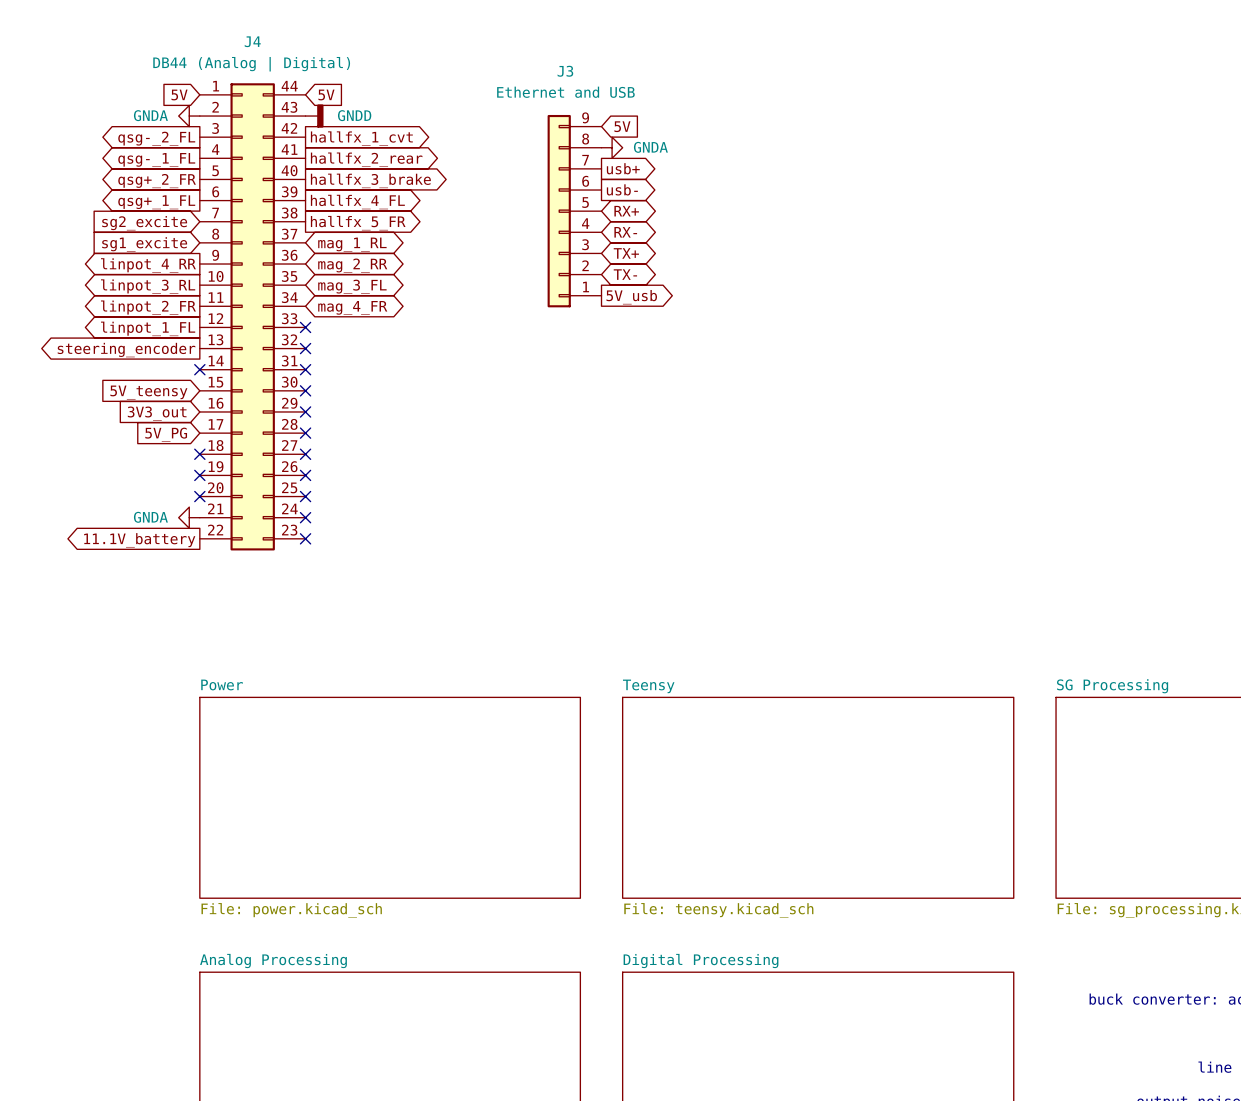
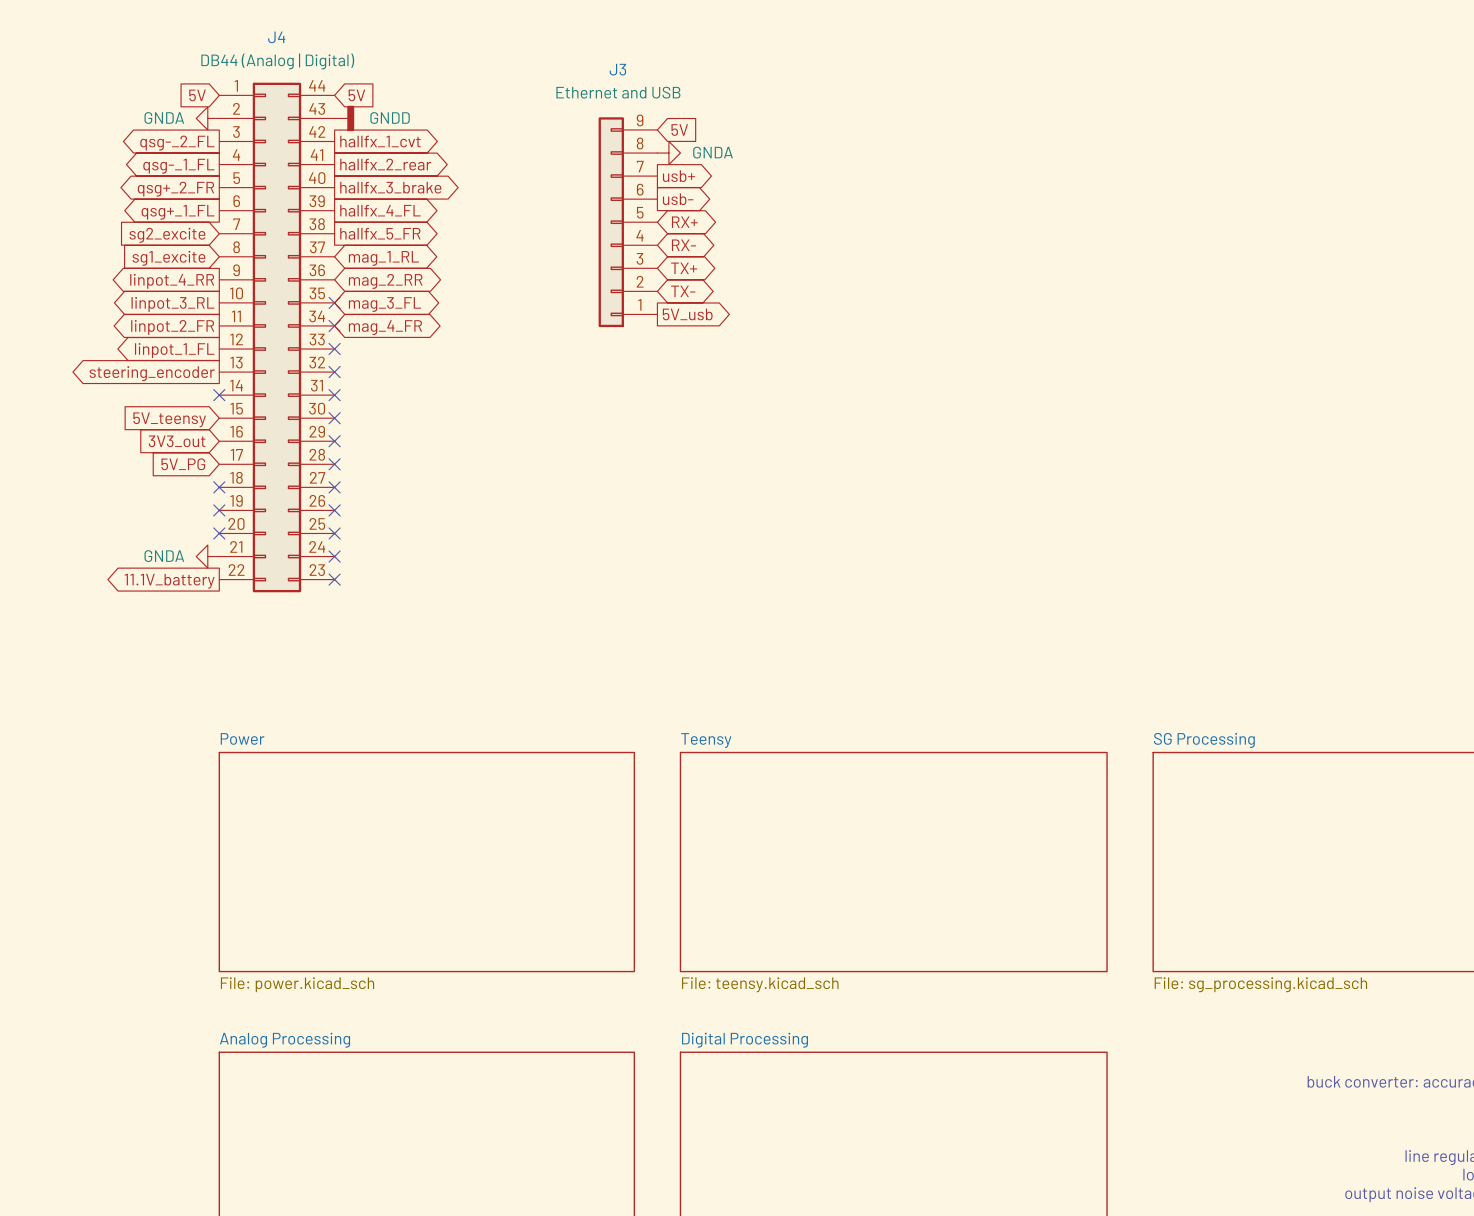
no-connect mark: none -> (334, 302)
no-connect mark: none -> (334, 325)

